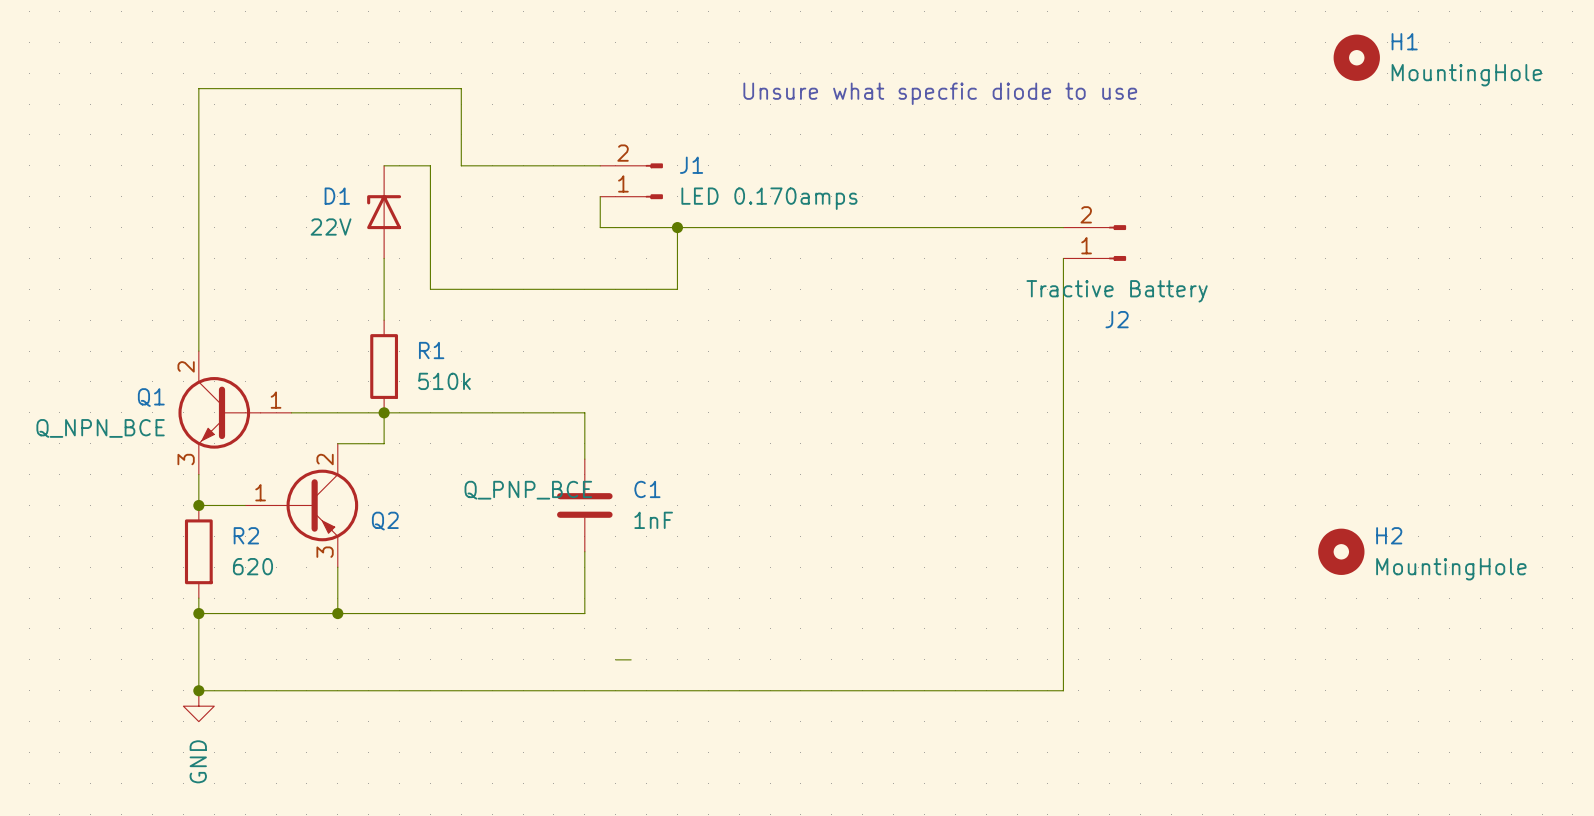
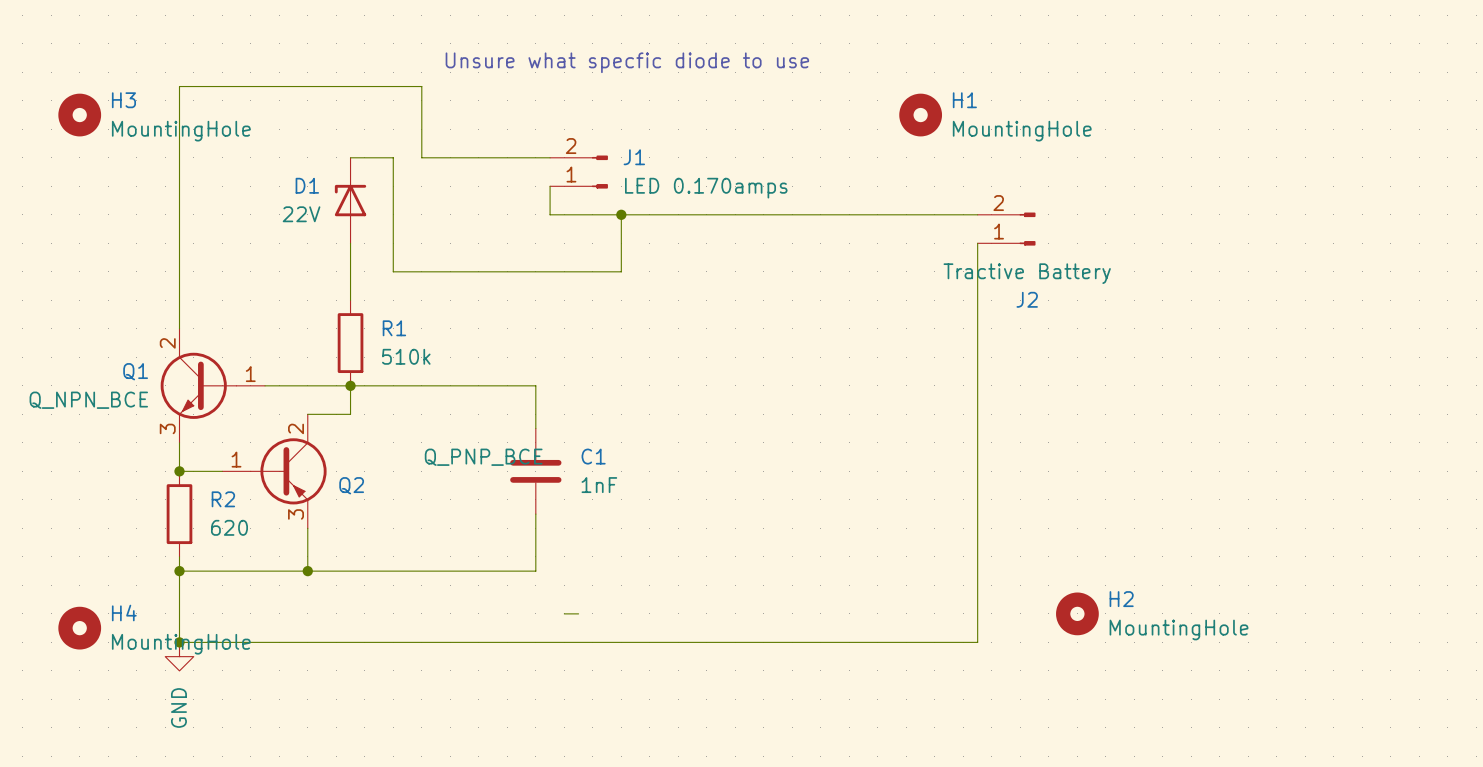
H1 position: (1356, 57) -> (920, 115)
text position: Unsure what specfic diode to use (940, 93) -> Unsure what specfic diode to use (627, 62)
H3: none -> MountingHole (79, 115)
H2 position: (1341, 551) -> (1077, 613)
H4: none -> MountingHole (79, 628)

